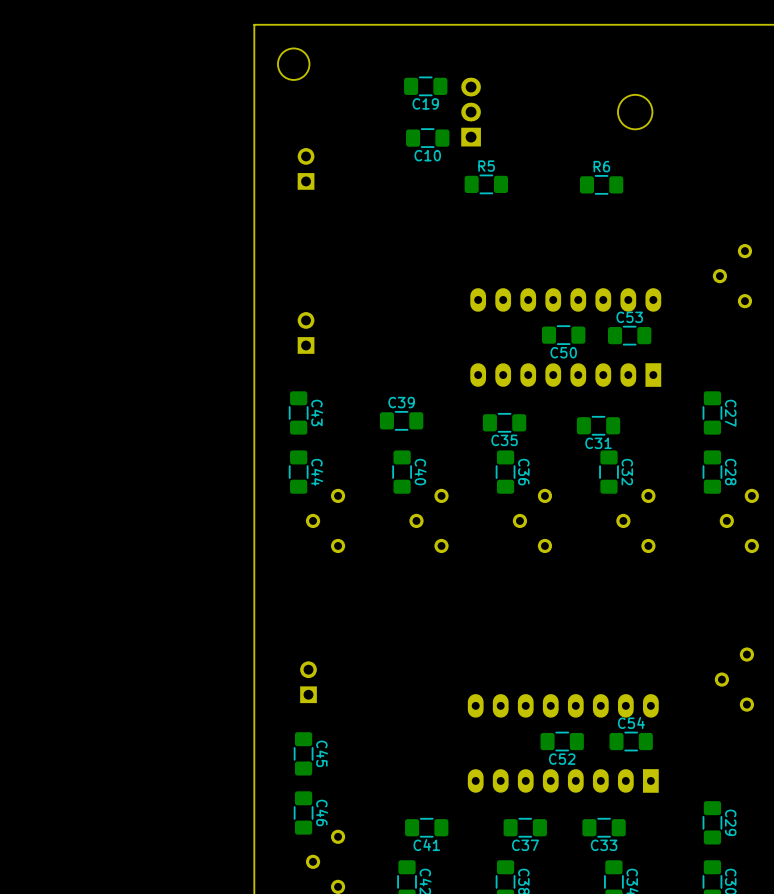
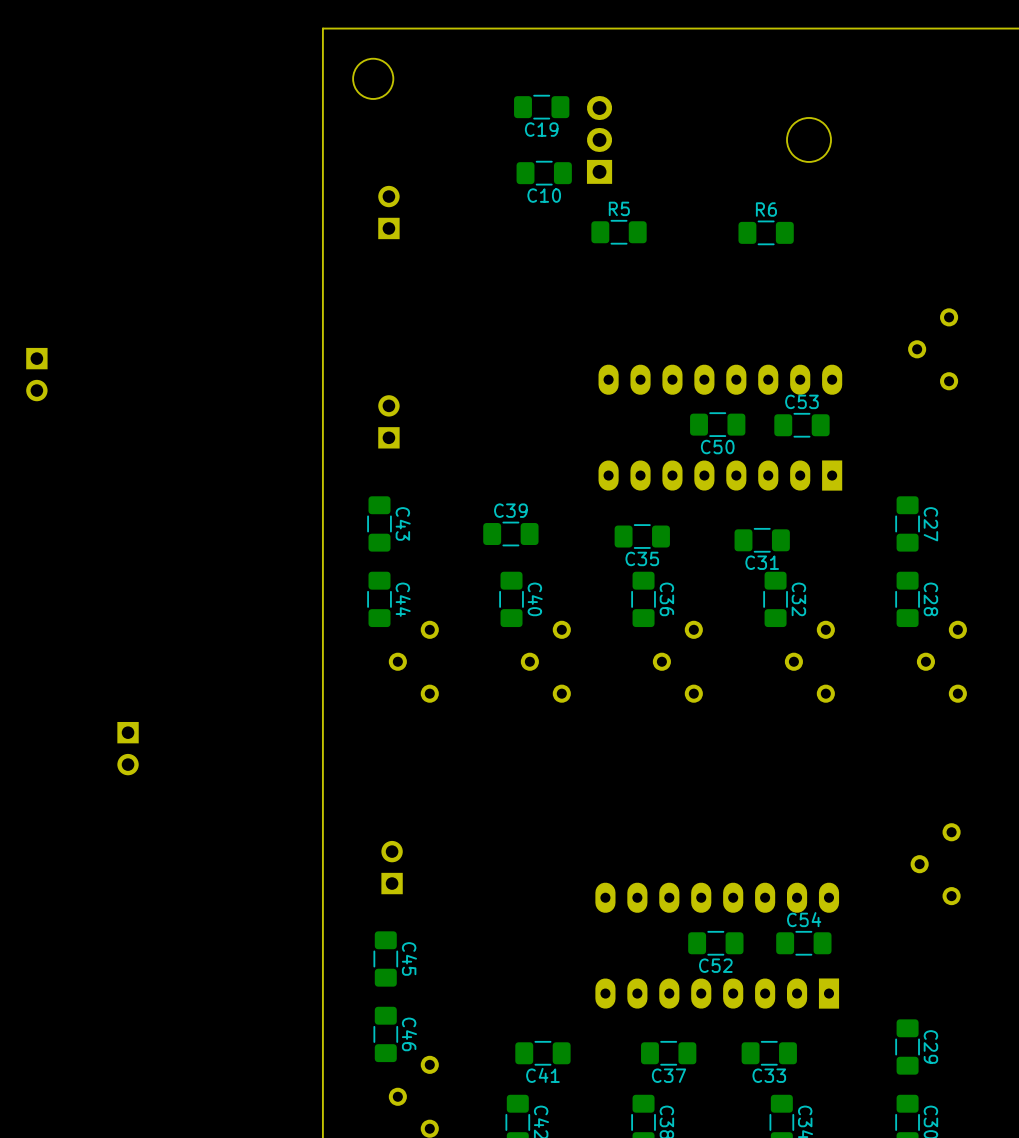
part: none -> (36, 374)
part: none -> (128, 748)

